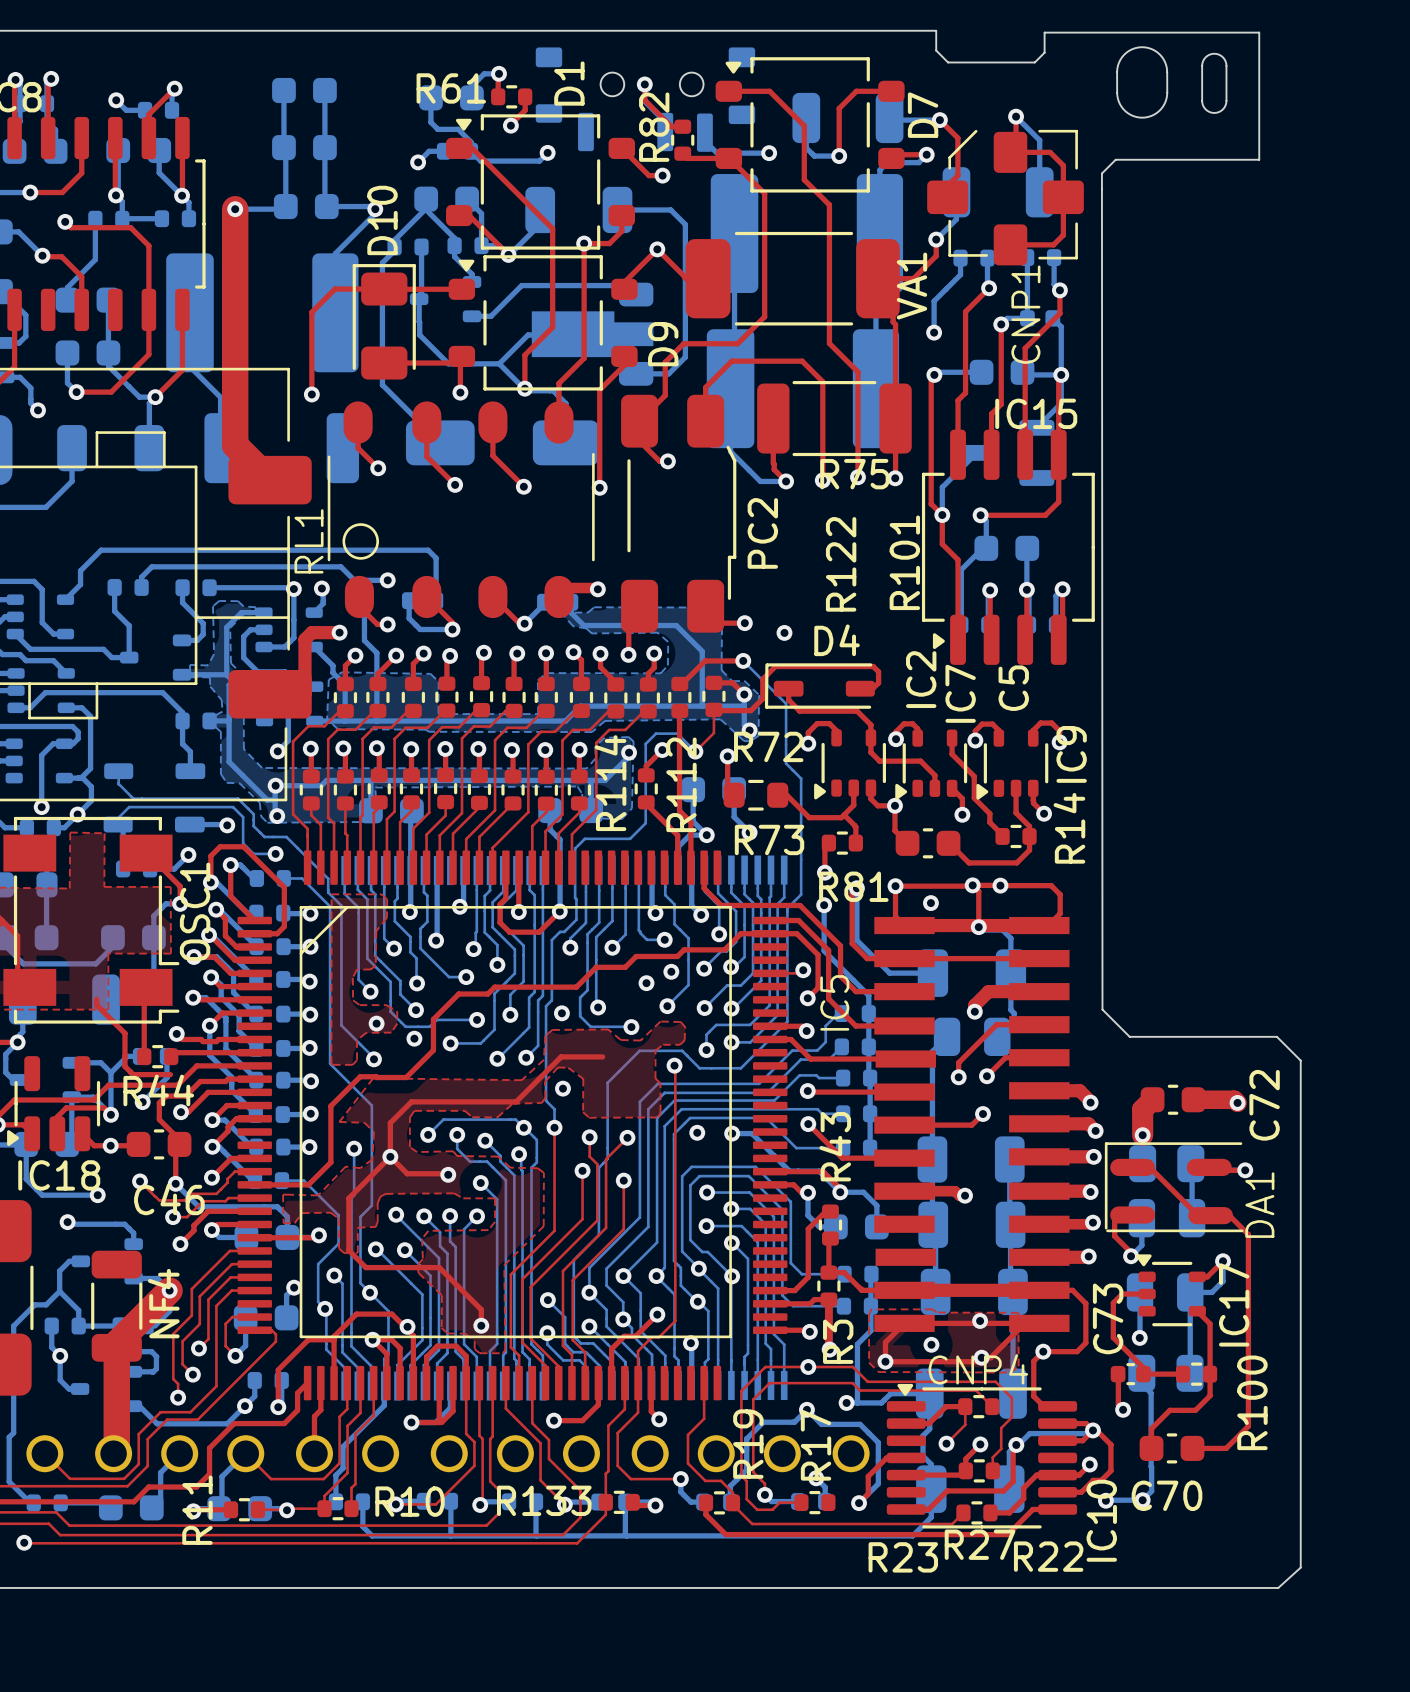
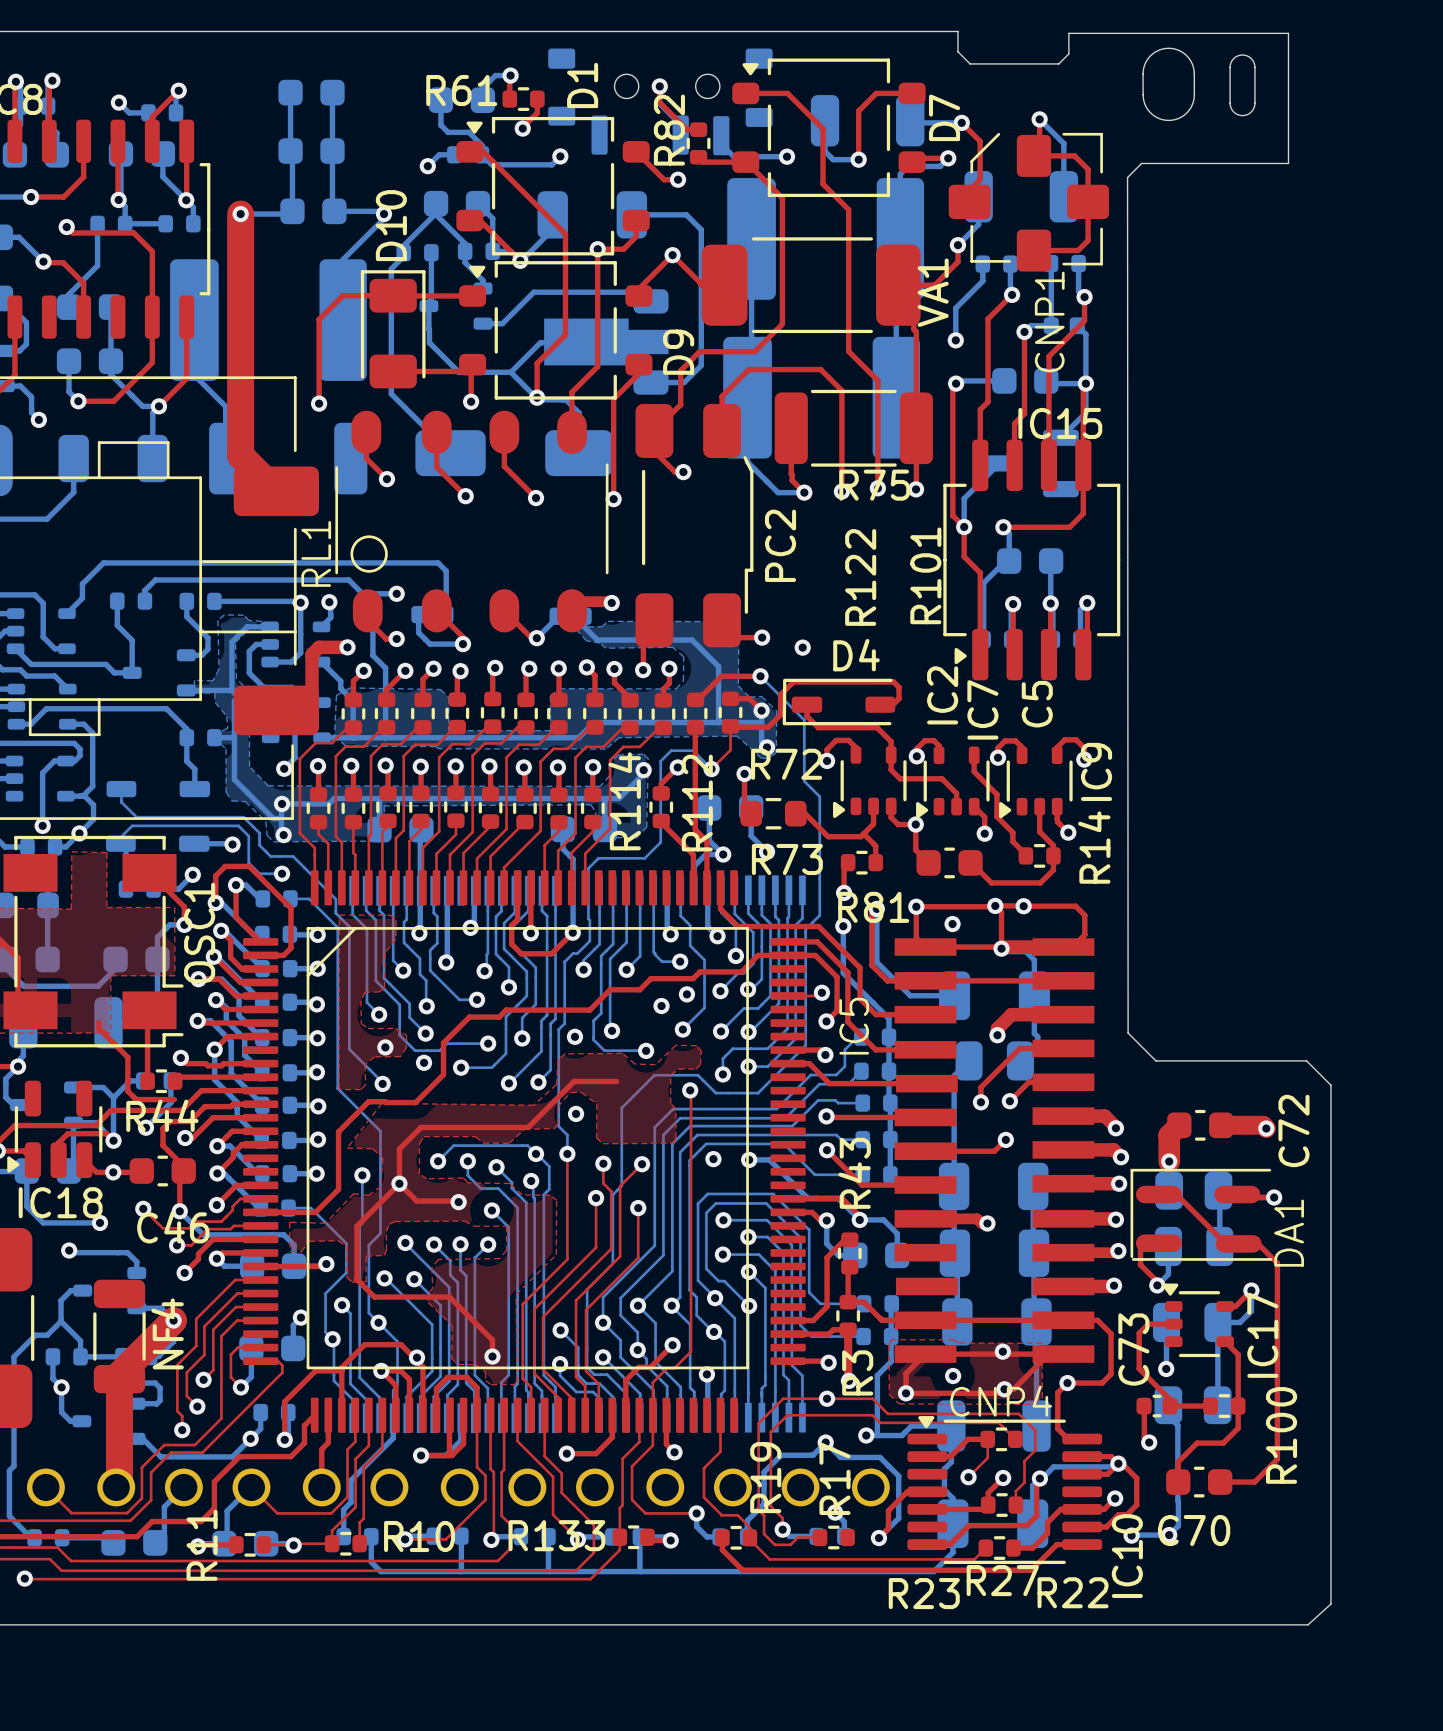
top track width: thick (904, 925) (977, 925) -> thin (925, 947) (999, 947)
top track width: thick (904, 1290) (1039, 1290) -> thin (925, 1320) (1063, 1320)

